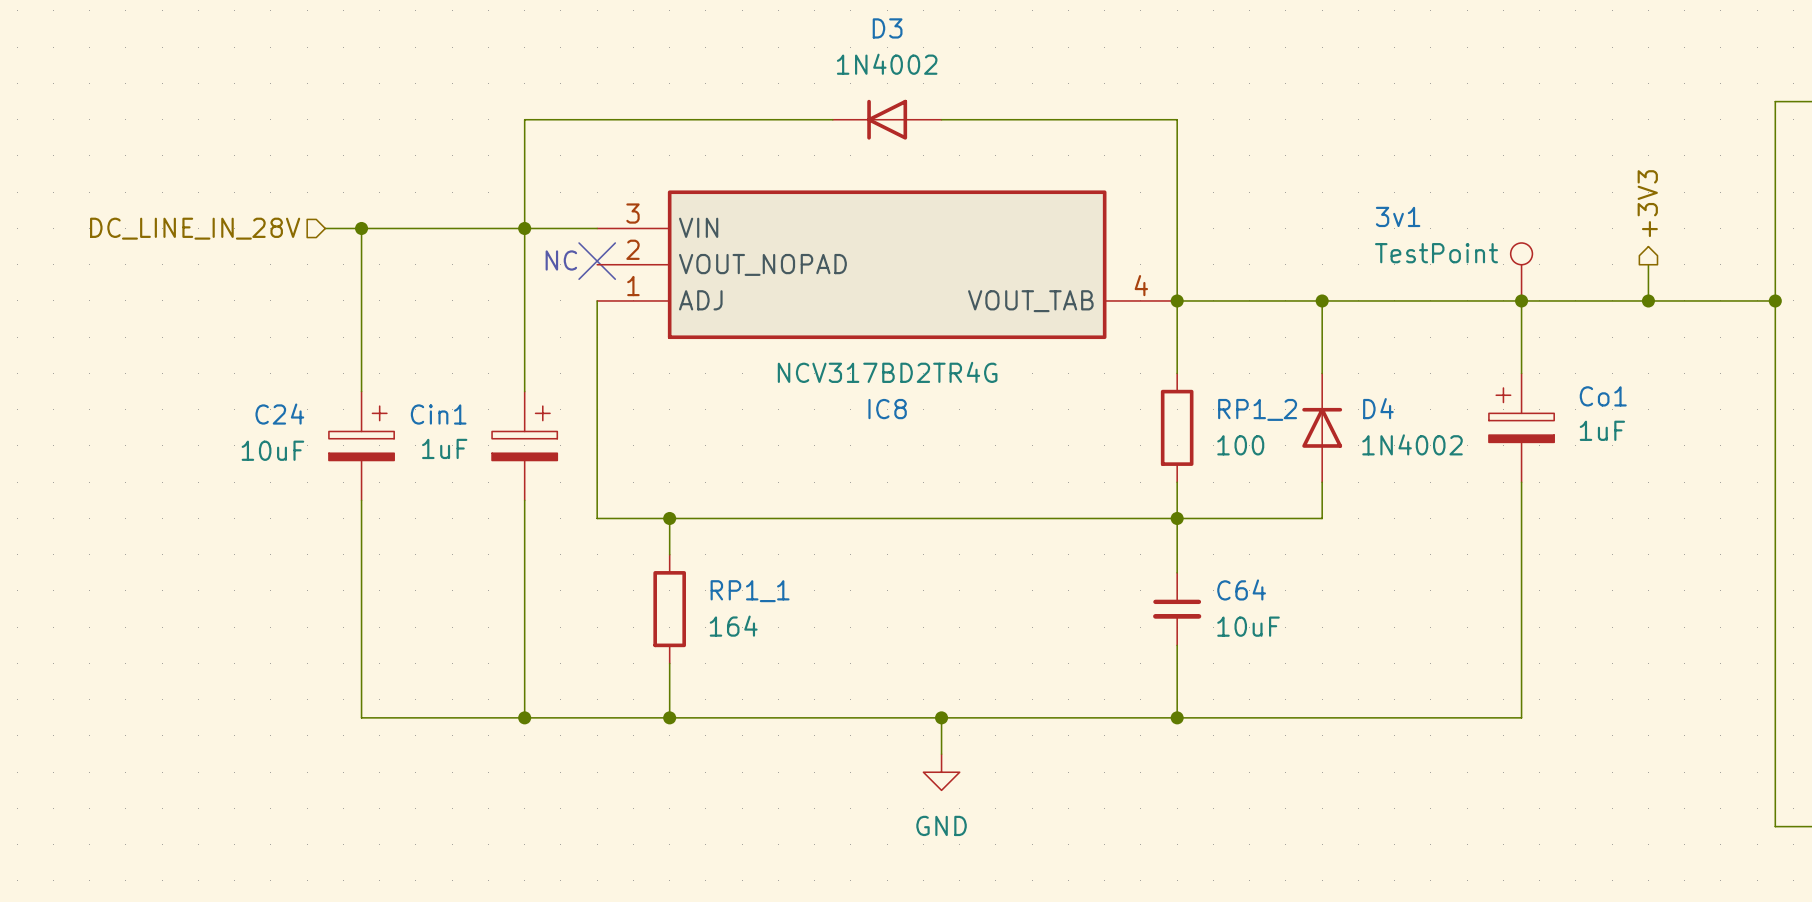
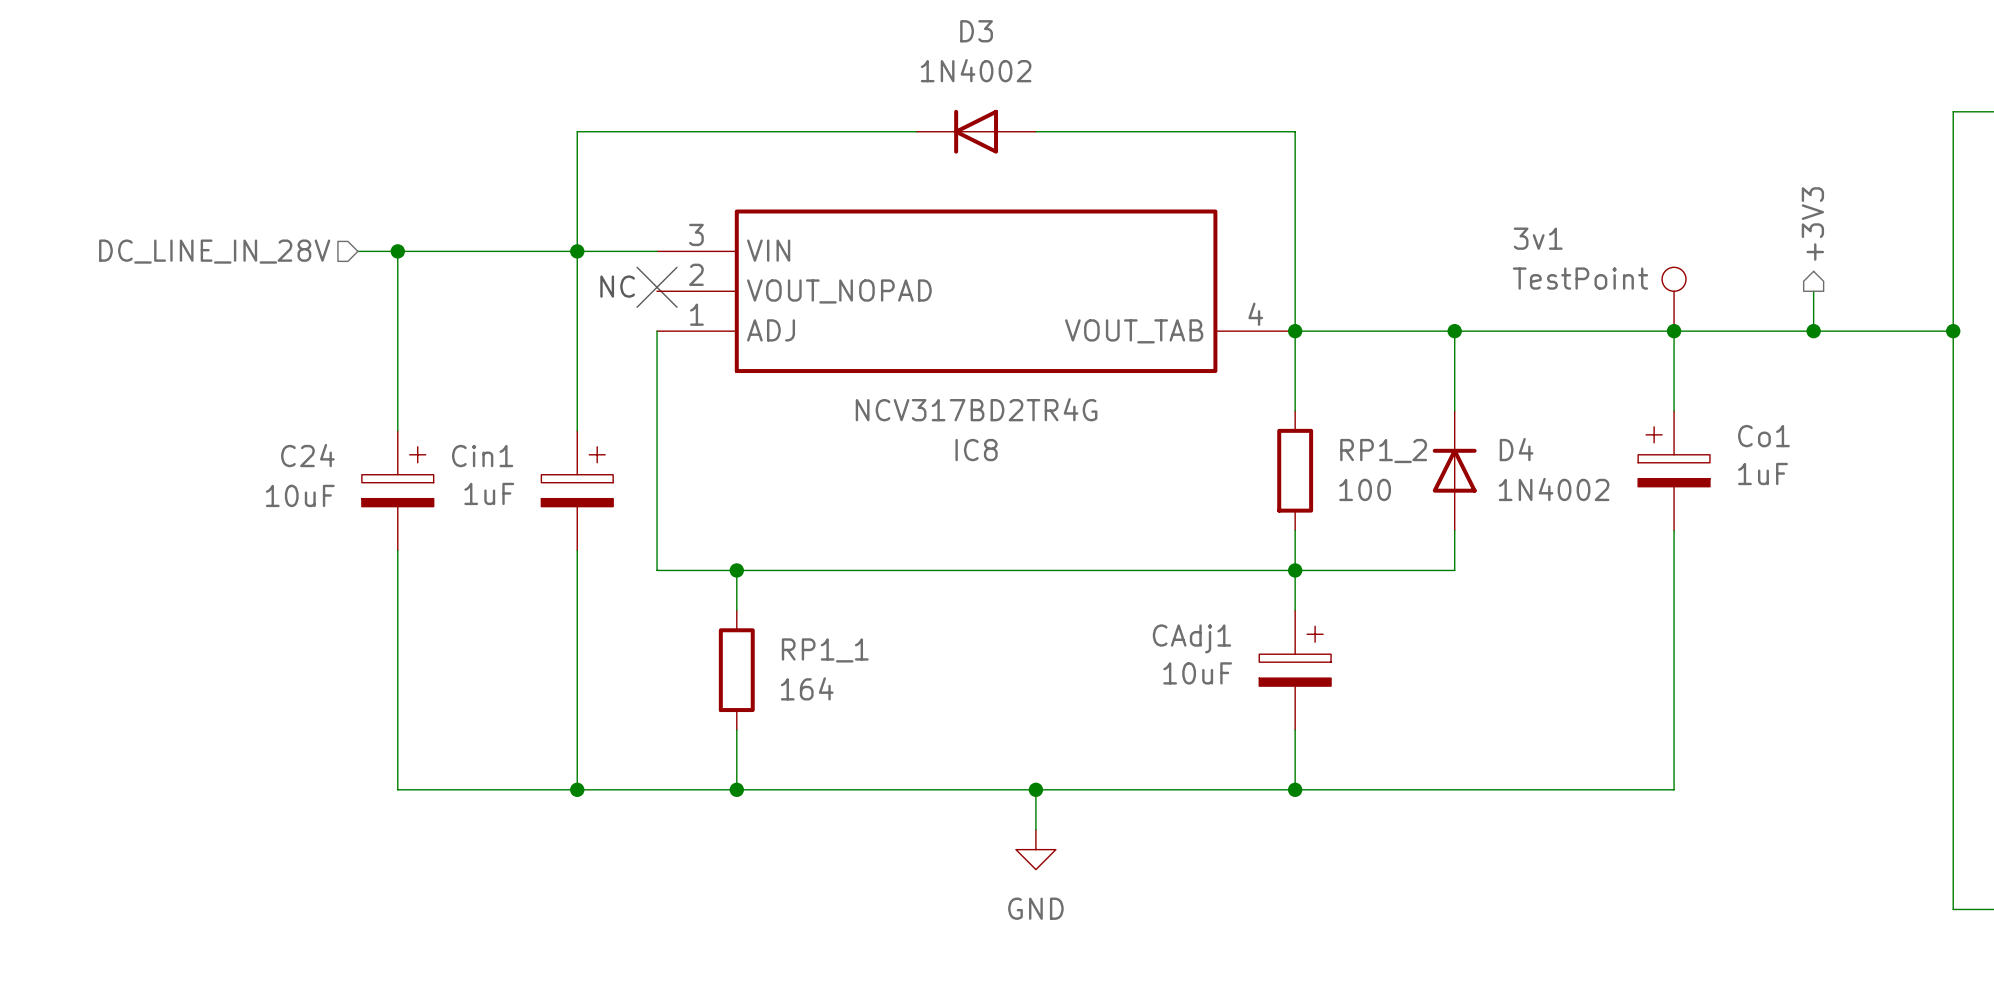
C64: 10uF (1177, 609) -> none
CAdj1: none -> 10uF (1295, 670)

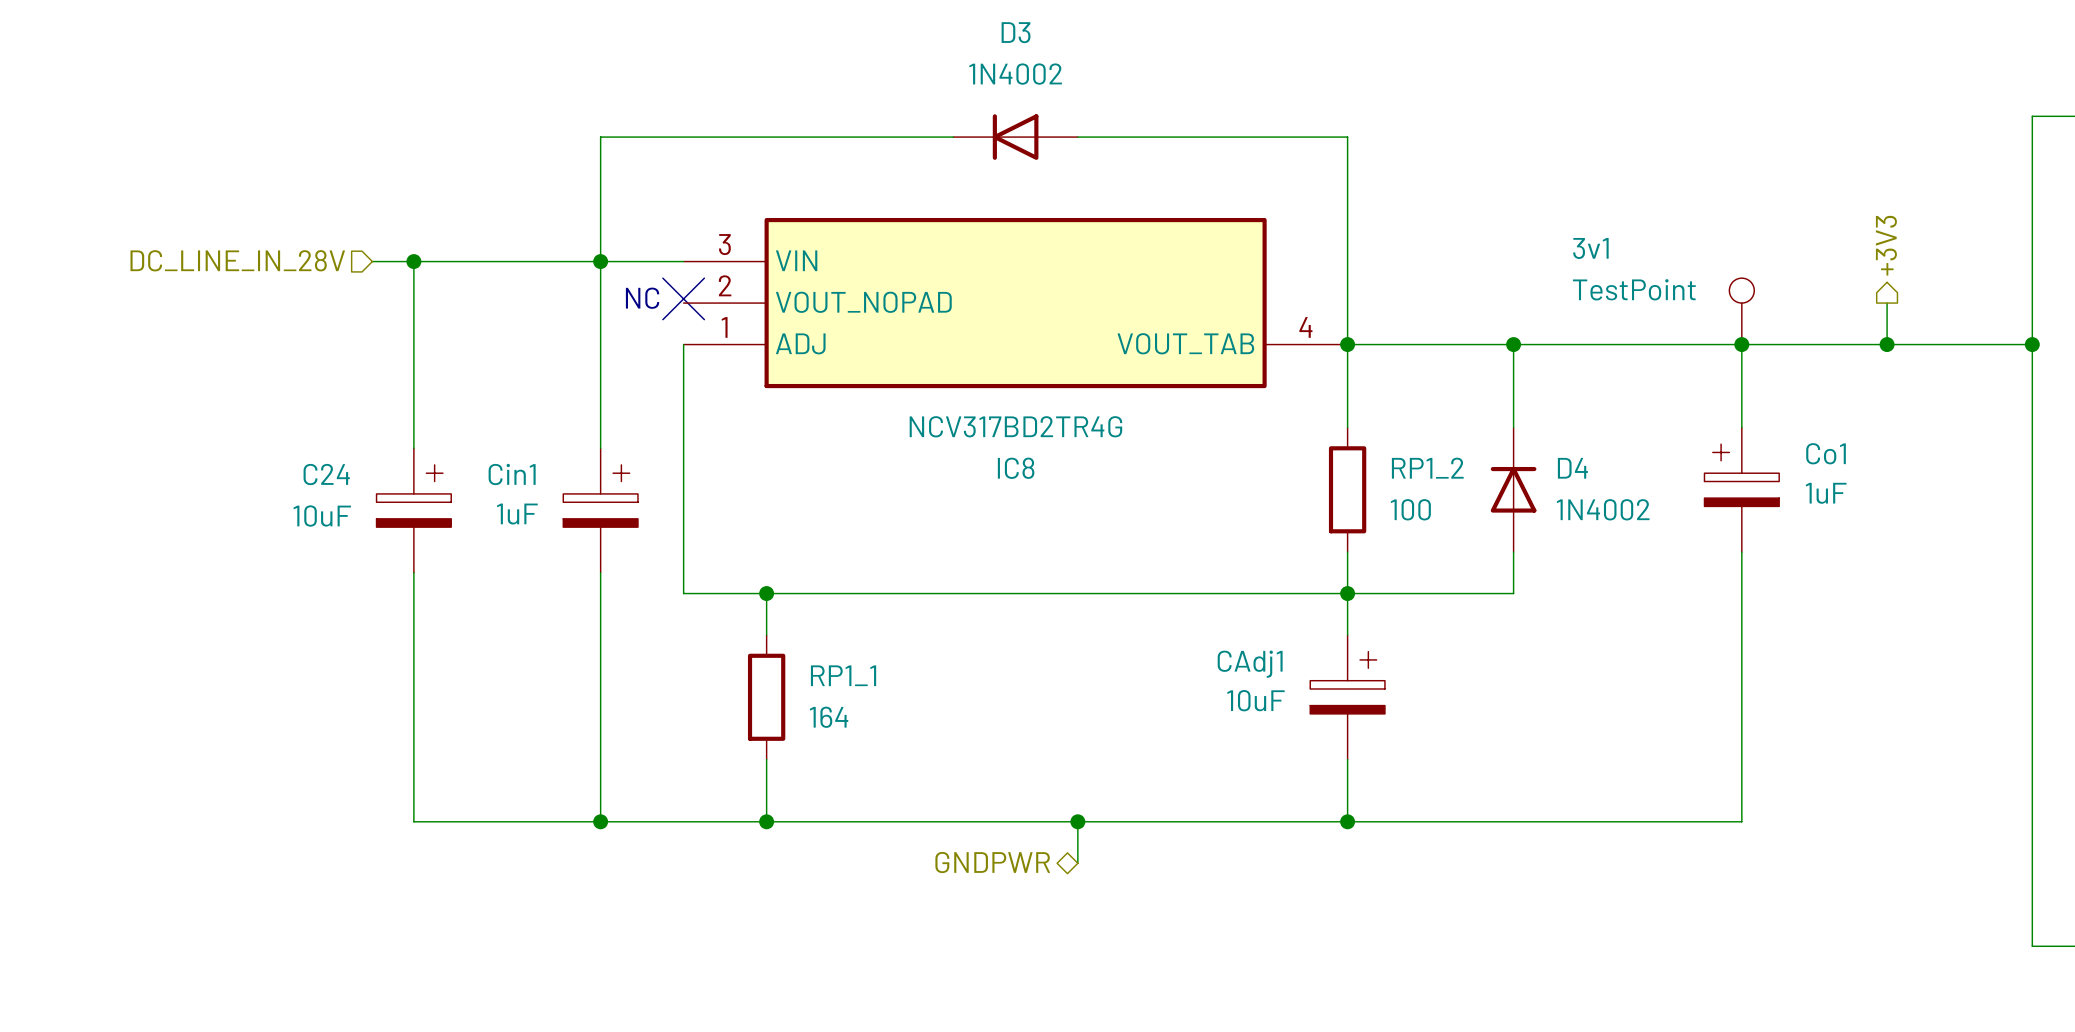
hierarchical label: none -> GNDPWR (992, 862)
power symbol: GND (1035, 849) -> none

